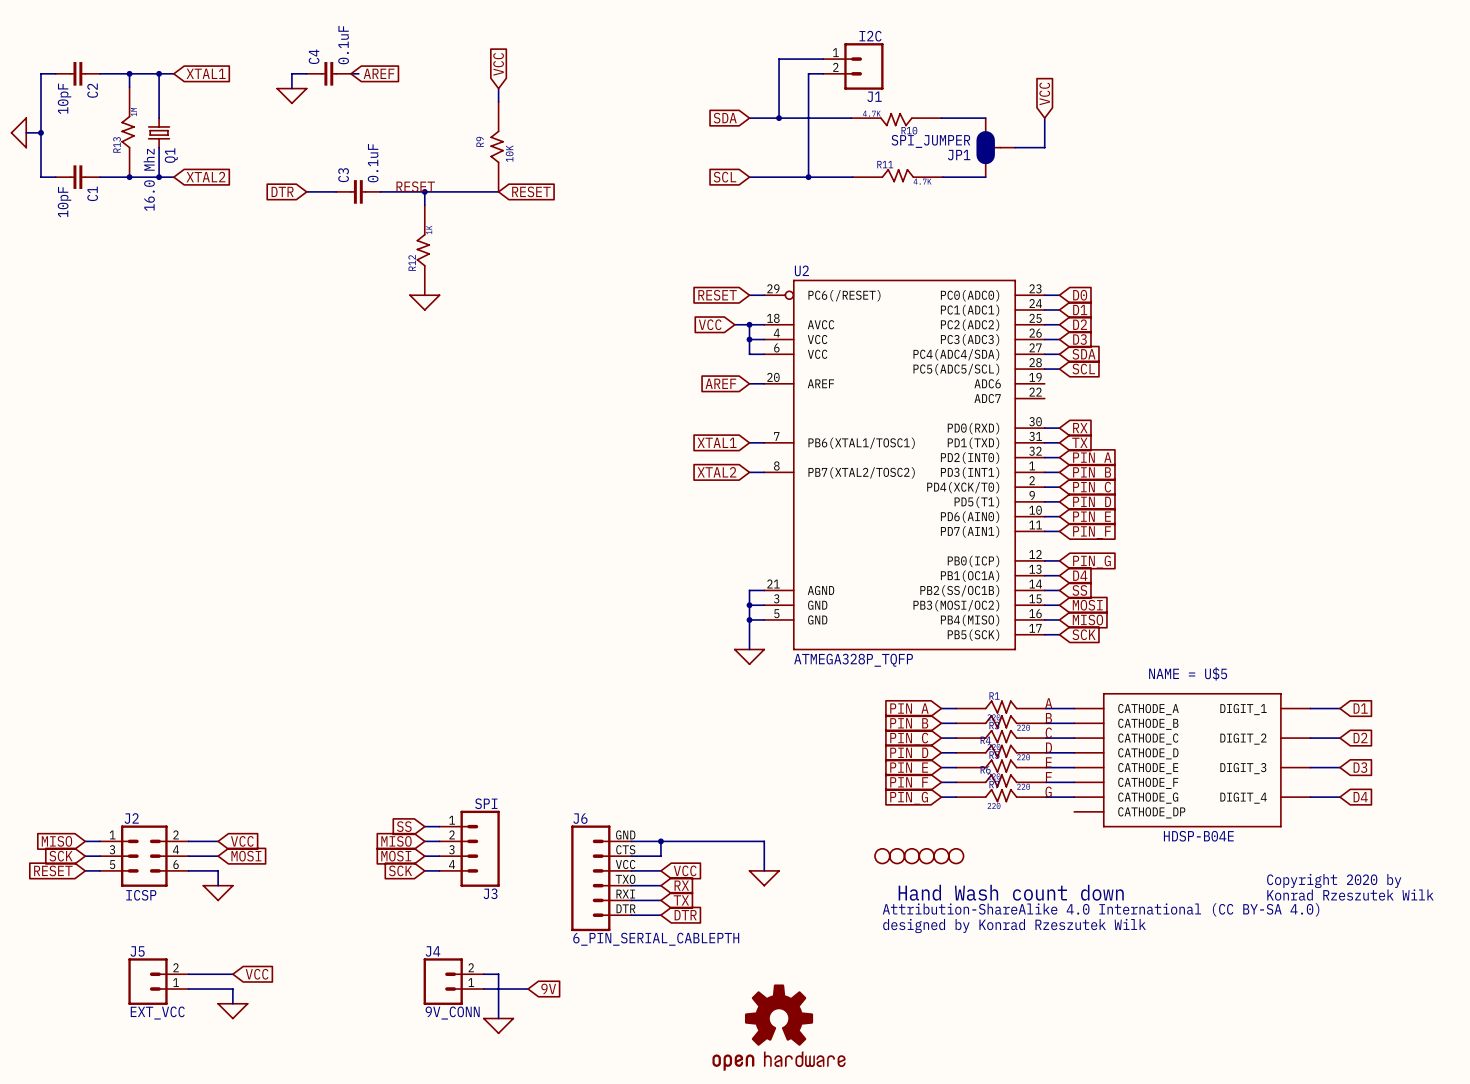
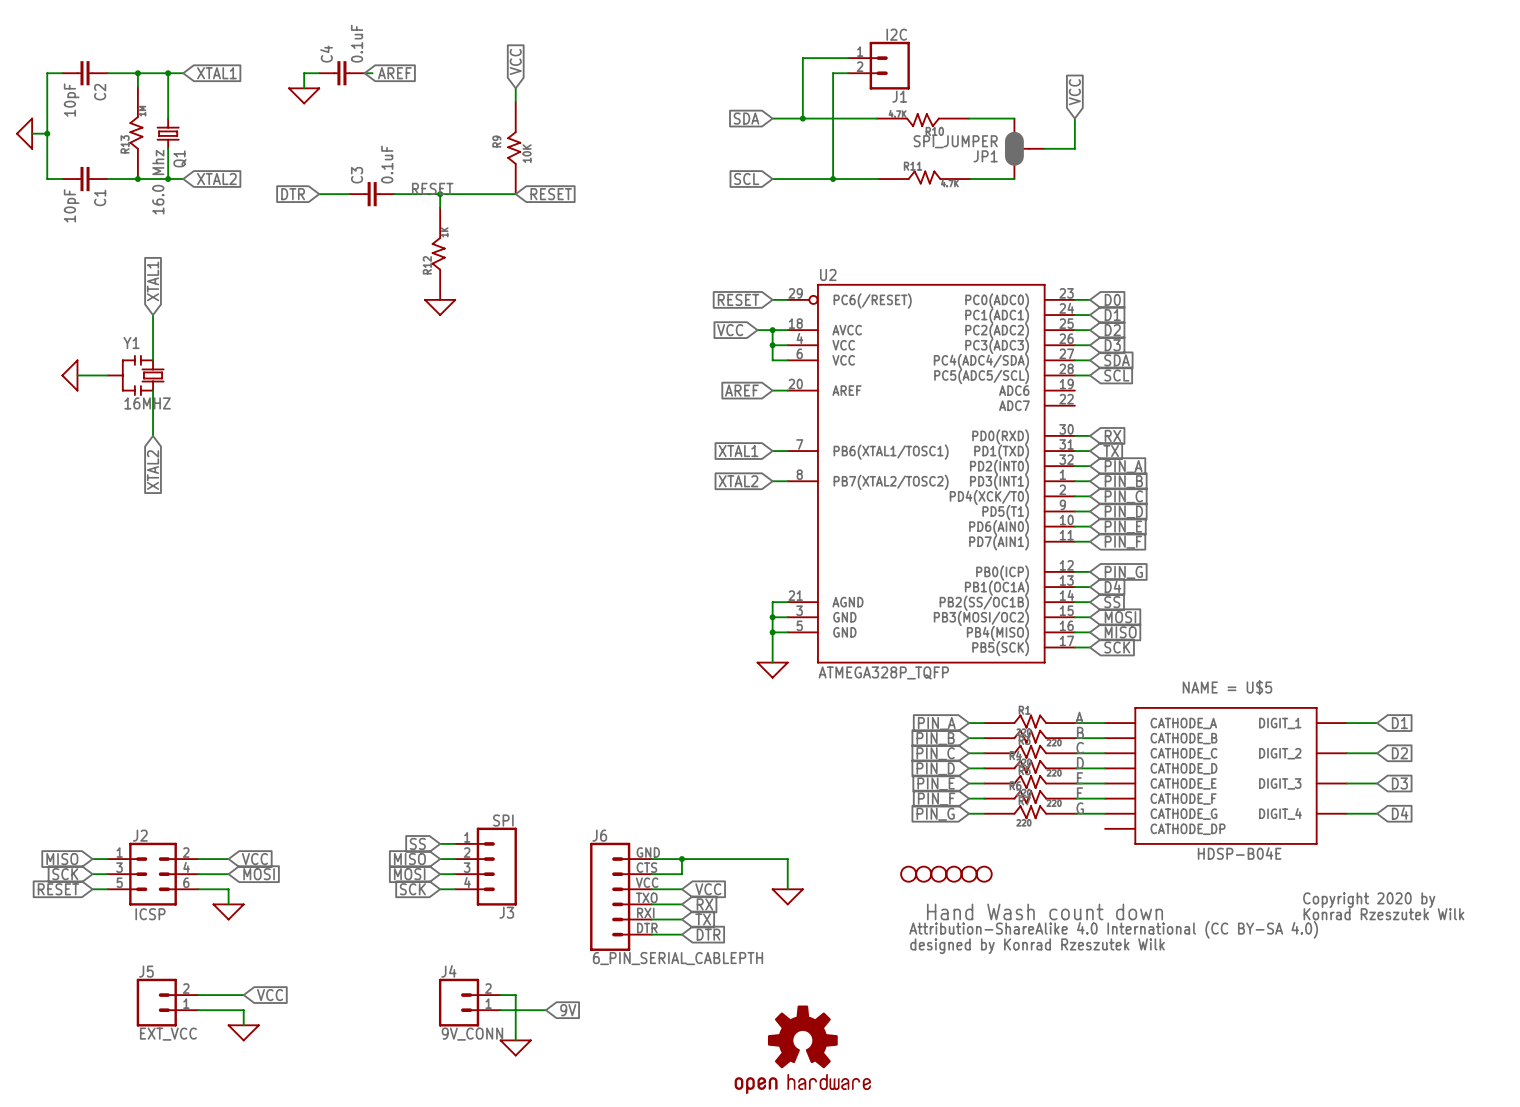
global label: none -> XTAL1 (153, 281)
wire: none -> (153, 315) (153, 360)
power symbol: none -> (69, 375)
wire: none -> (77, 375) (107, 375)
Y1: none -> 16MHZ (135, 375)
wire: none -> (153, 390) (153, 435)
global label: none -> XTAL2 (153, 470)

